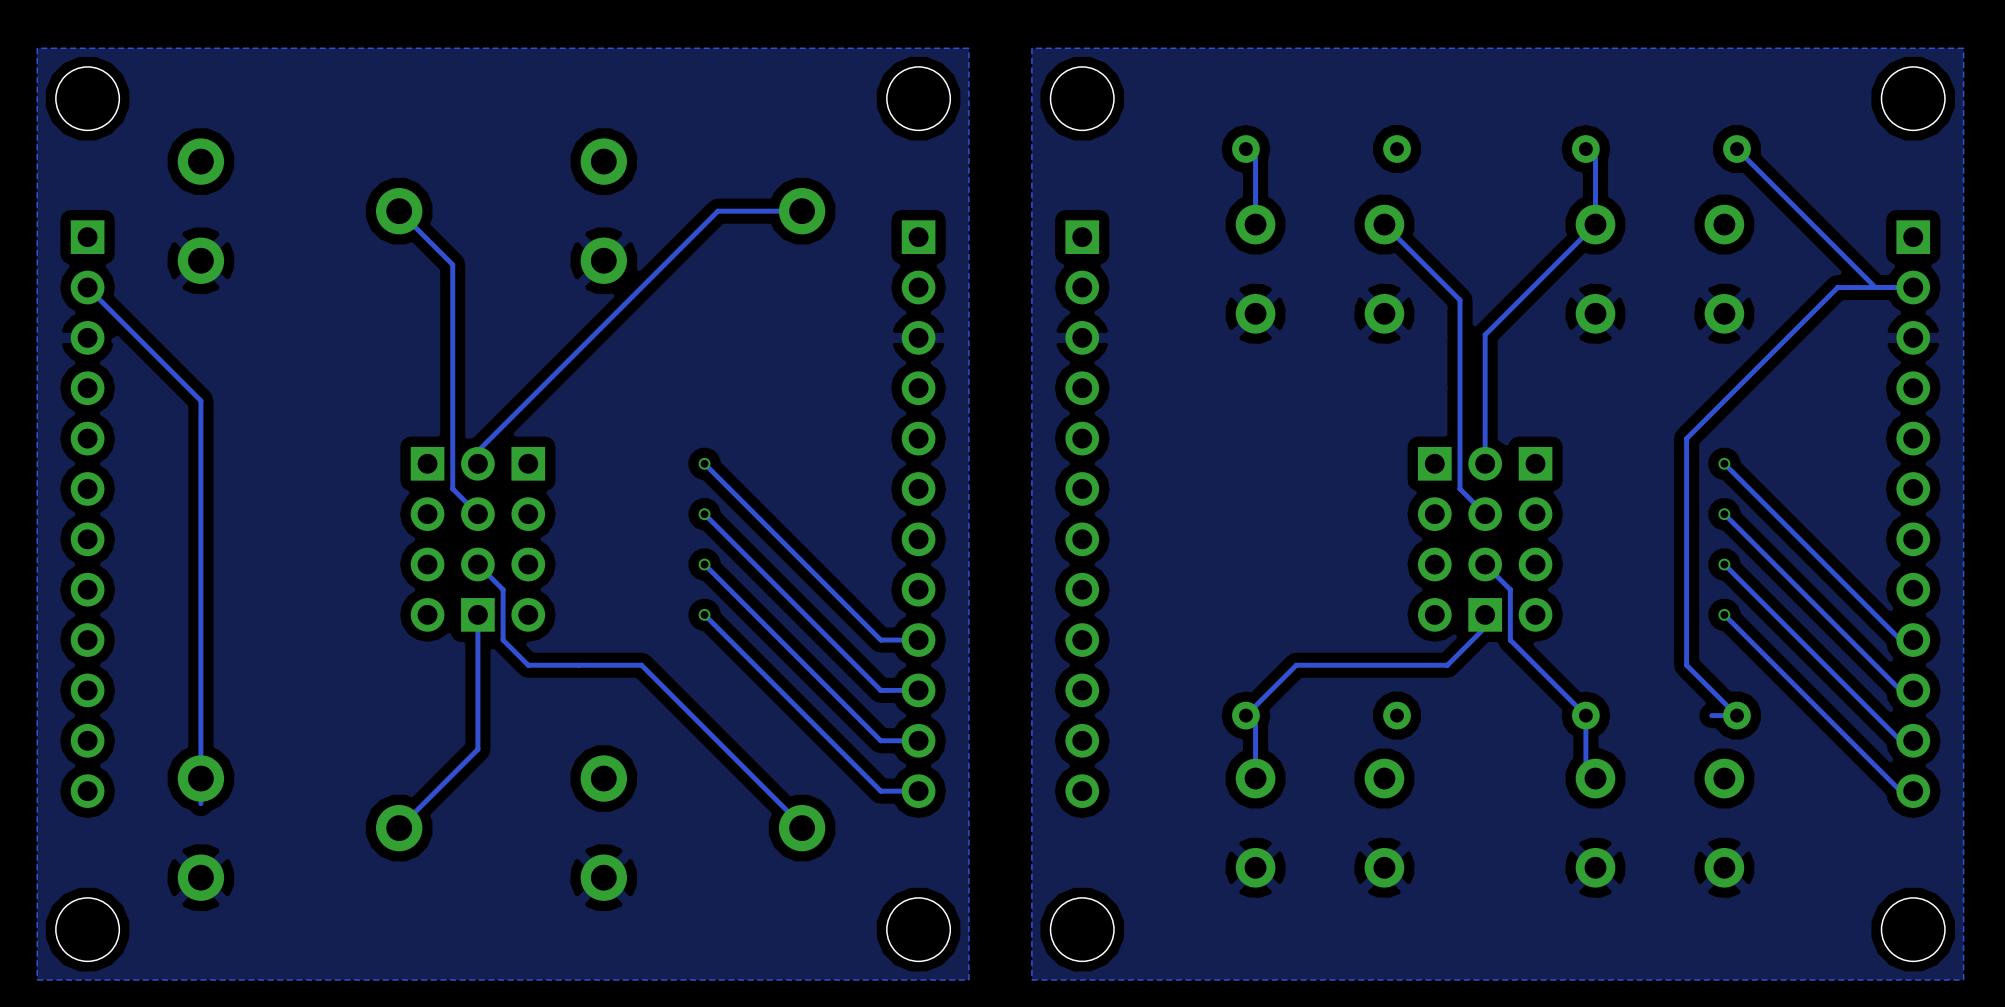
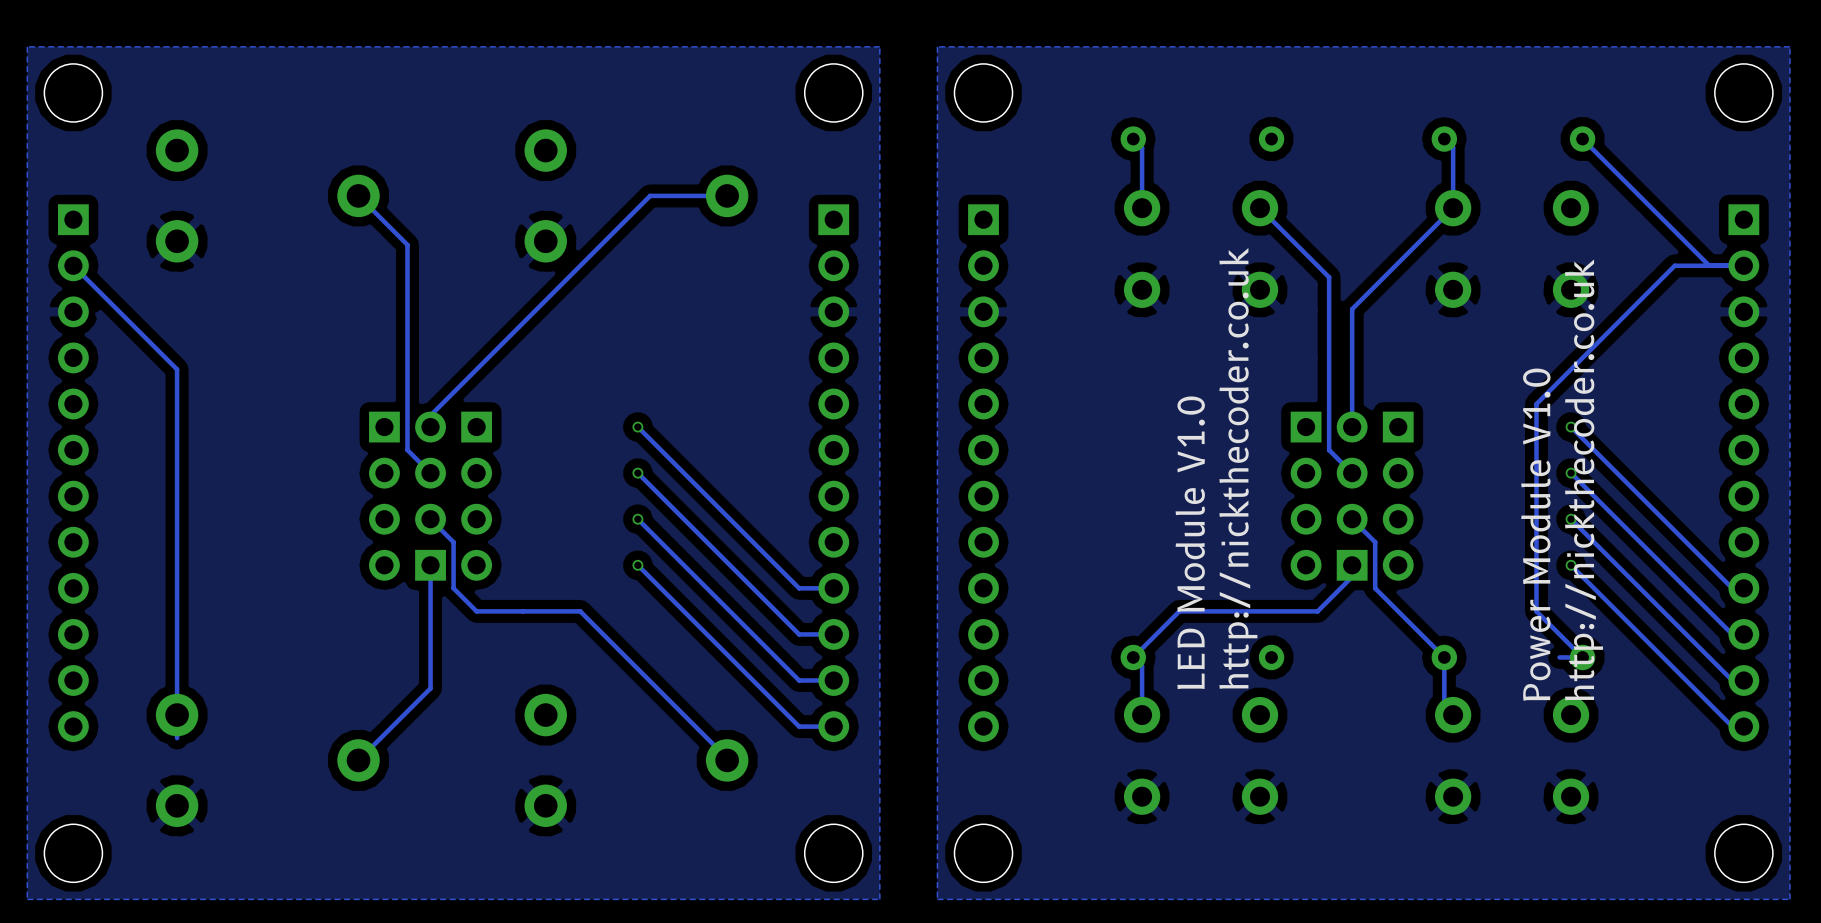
text: none -> http://nickthecoder.co.uk (1238, 468)
text: none -> http://nickthecoder.co.uk (1584, 479)
text: none -> Power Module V1.0 (1535, 534)
text: none -> LED Module V1.0 (1190, 542)

